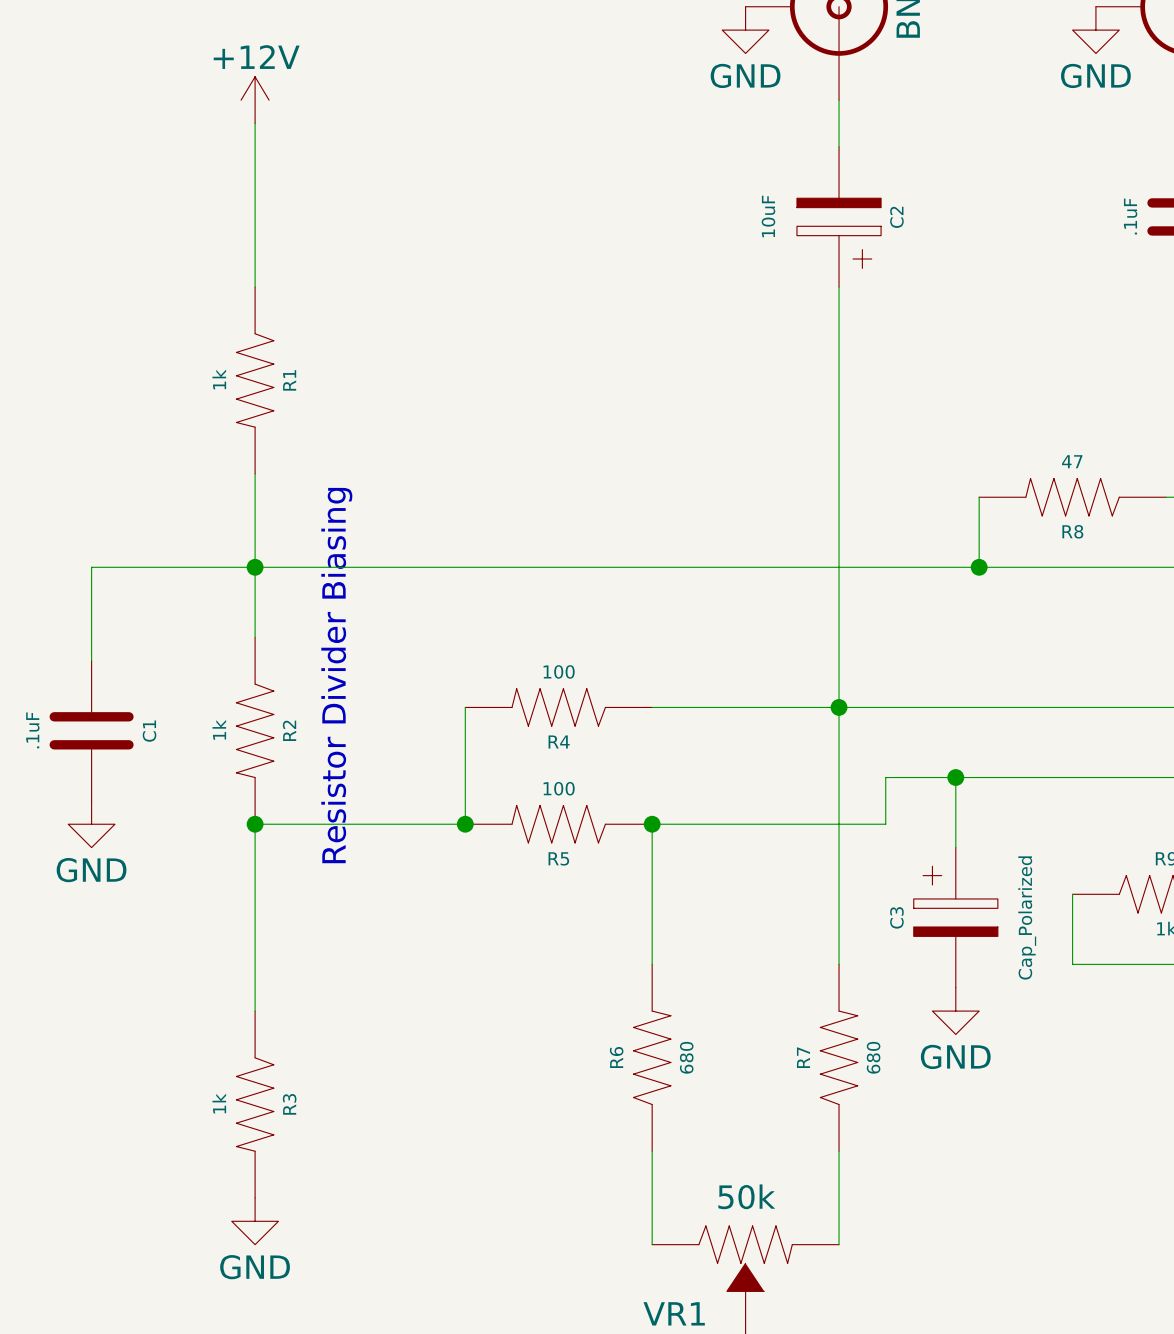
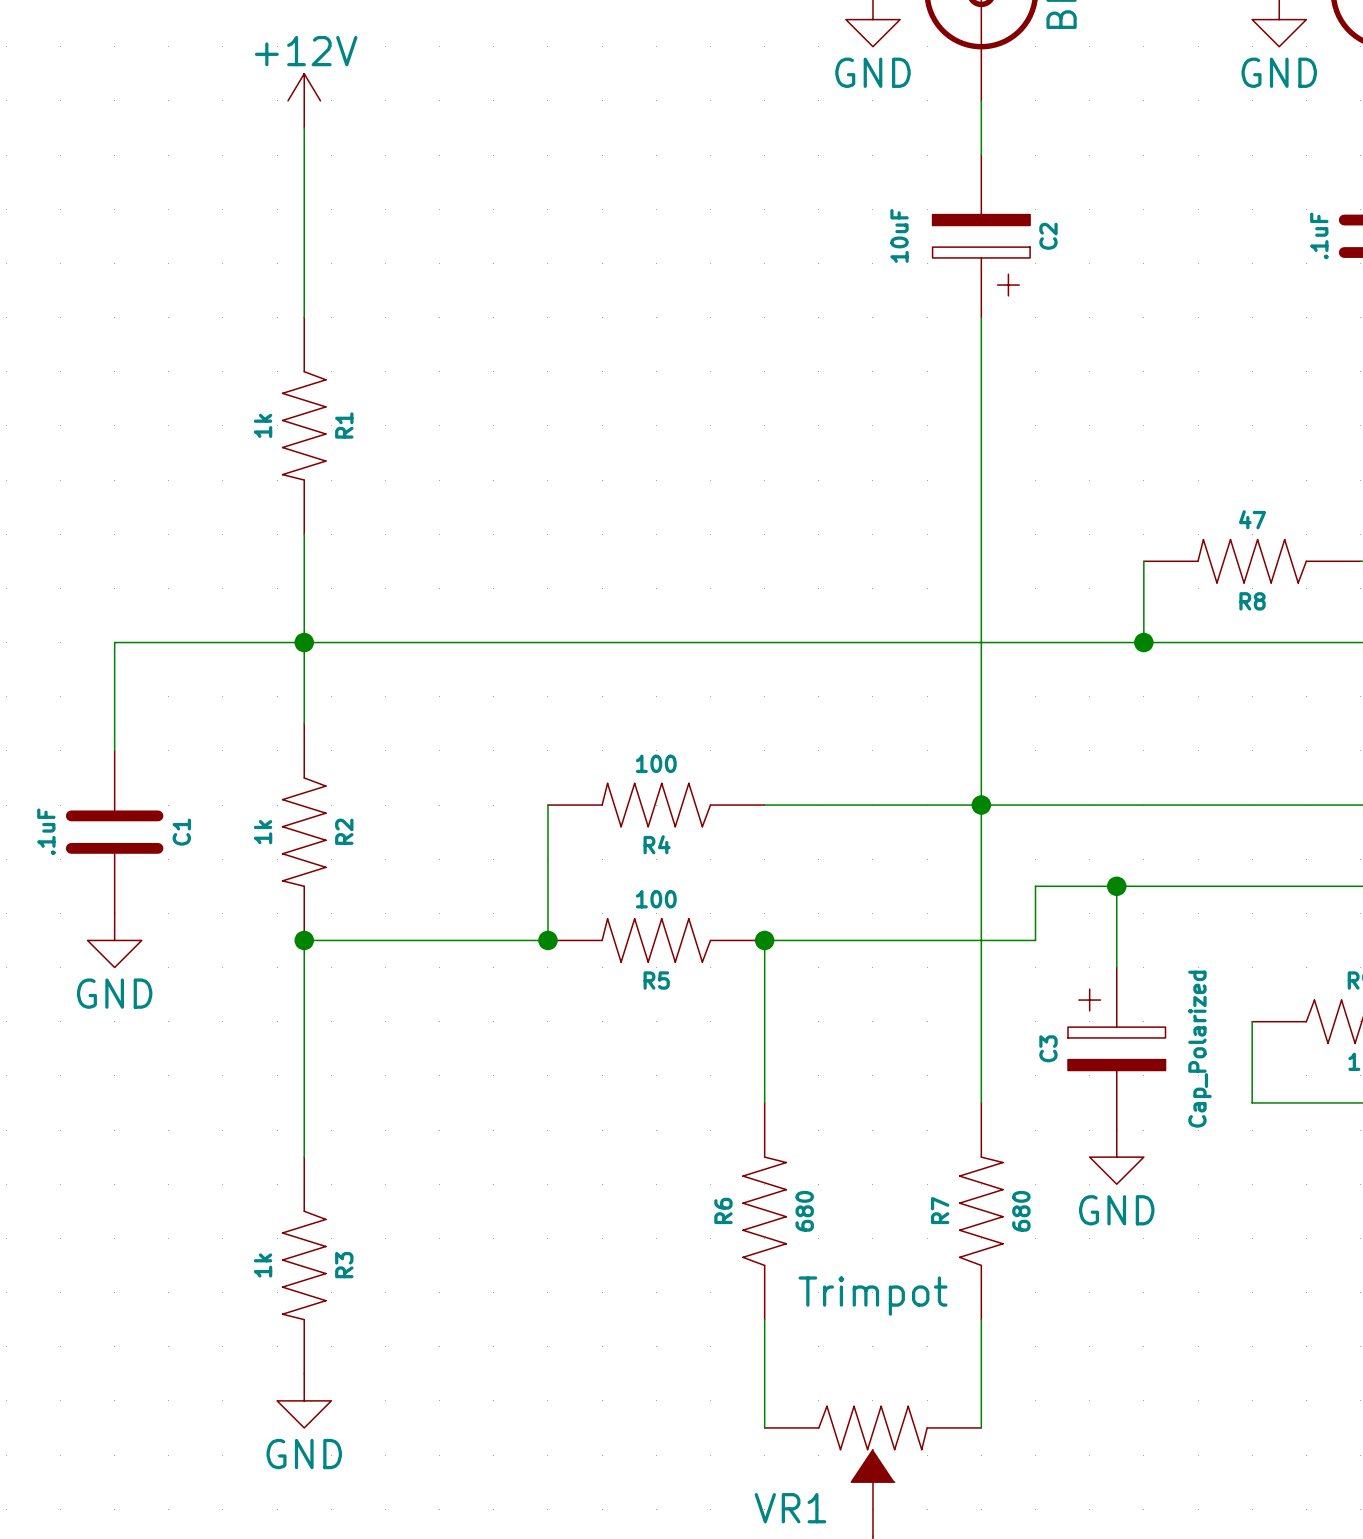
text: Resistor Divider Biasing (336, 675) -> none
VR1 value: 50k (746, 1196) -> Trimpot (872, 1296)

